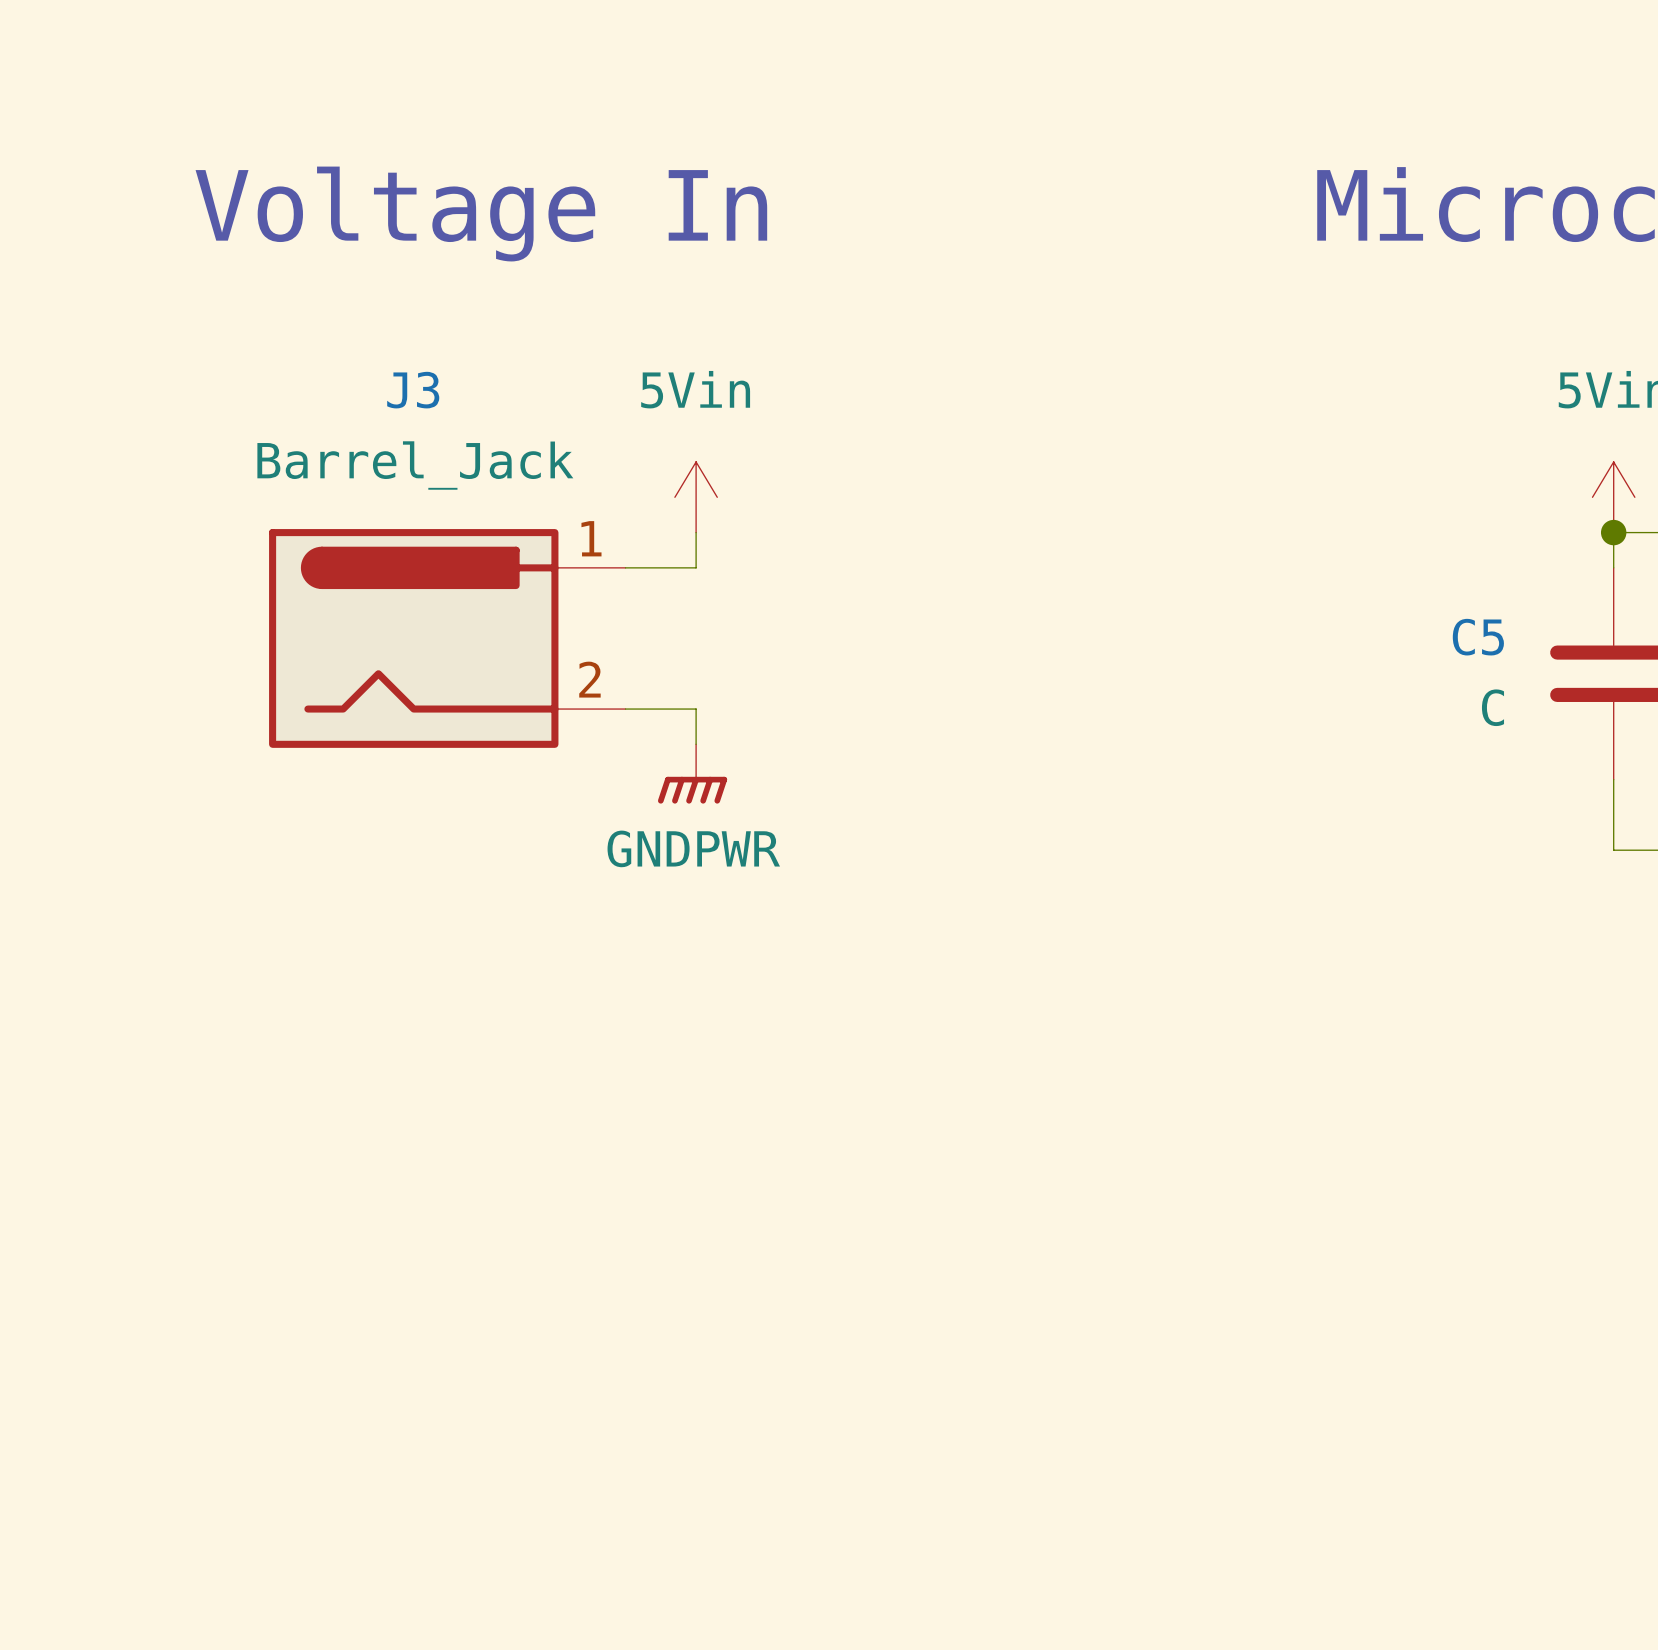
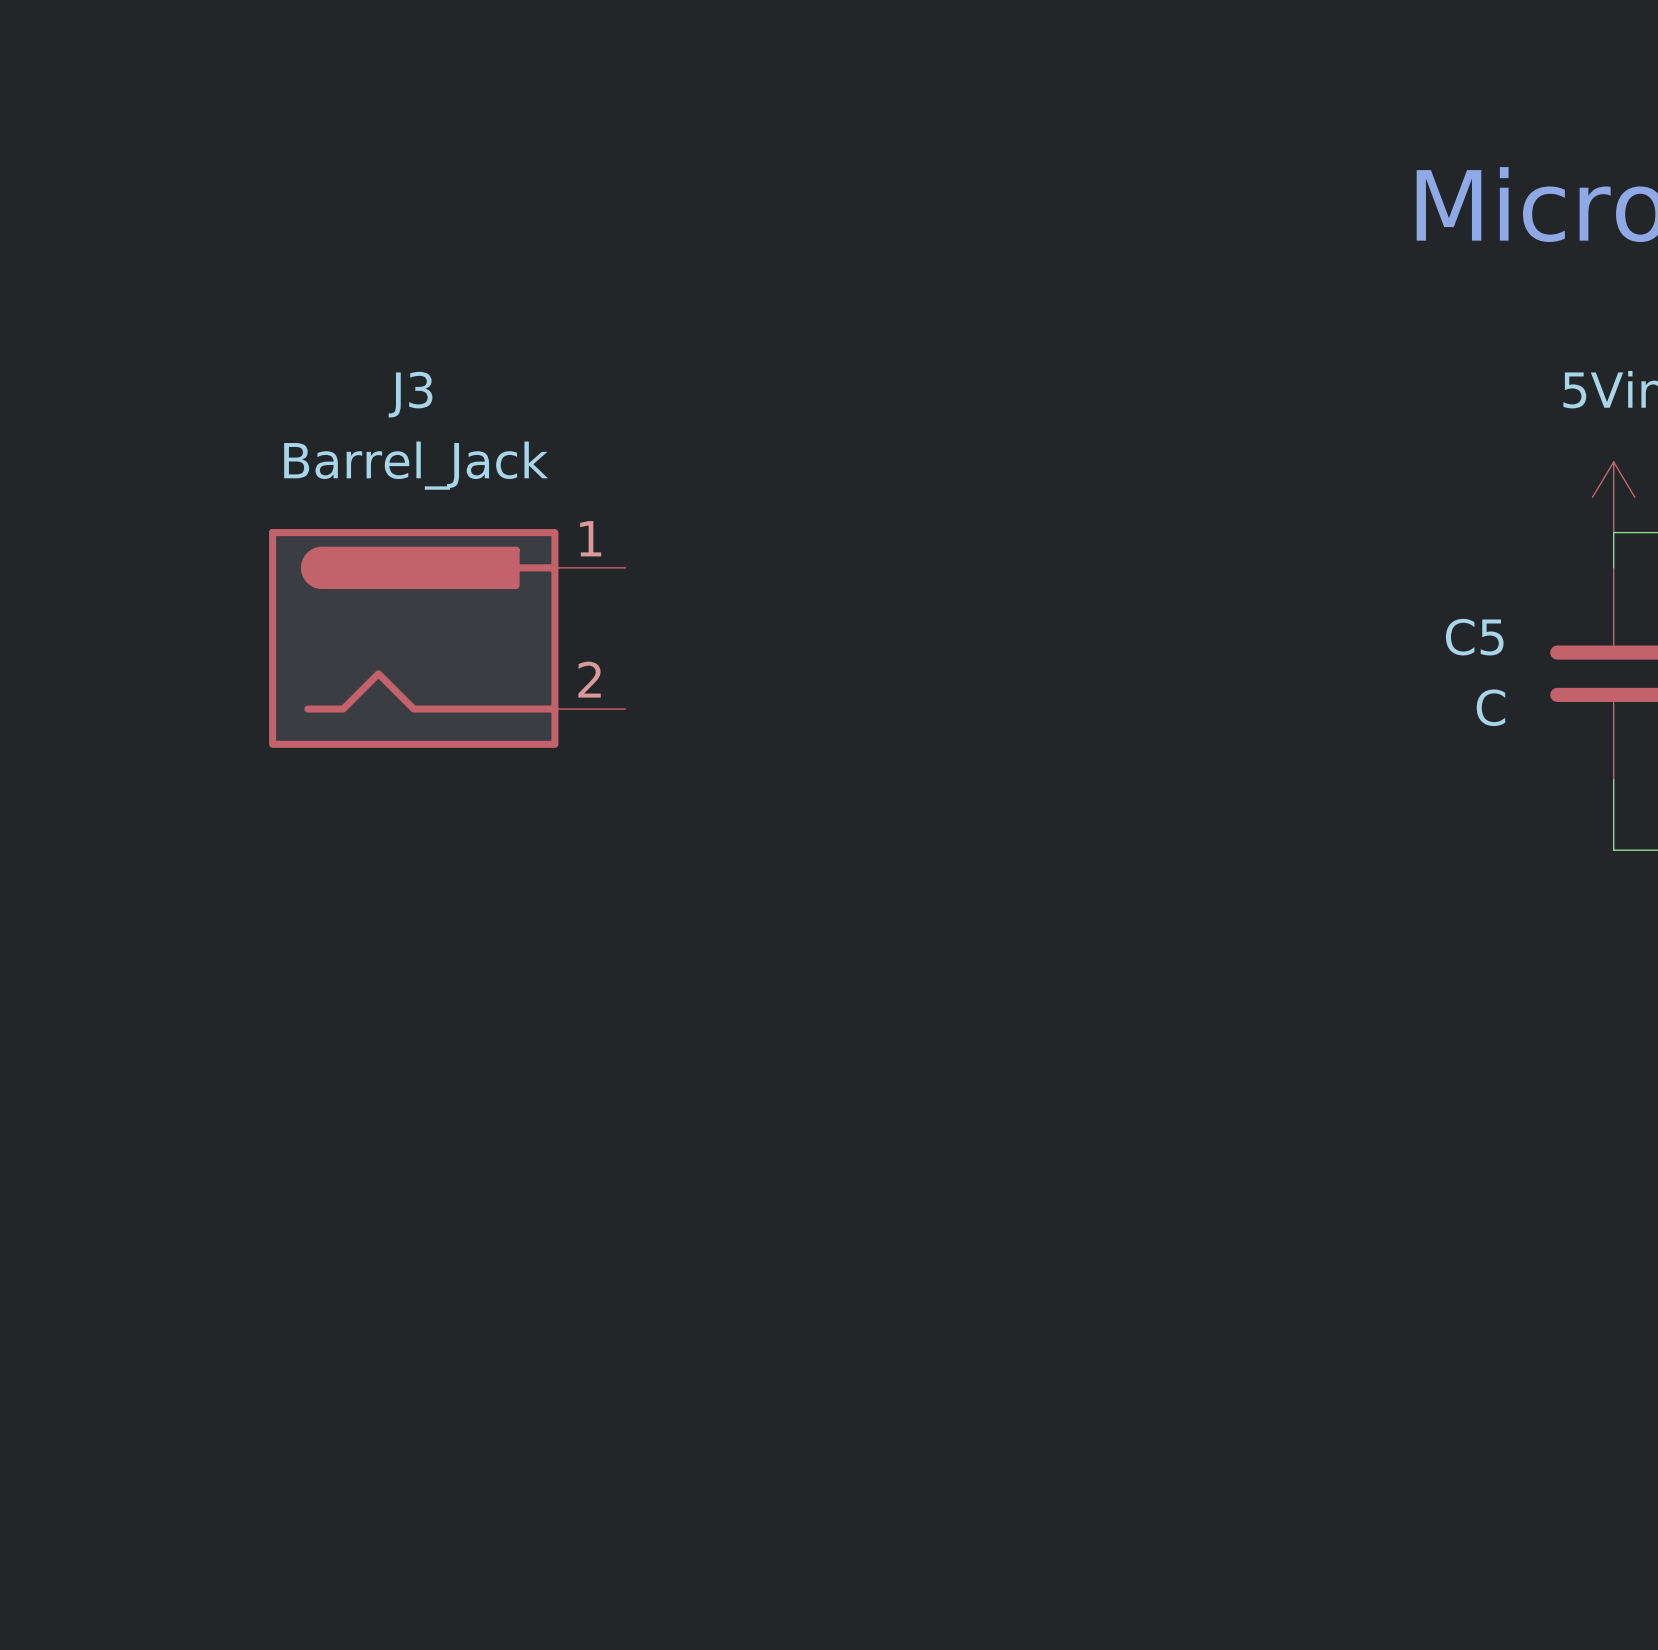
text: Voltage In (481, 214) -> none
power symbol: 5Vin (696, 497) -> none
wire: (696, 532) (696, 567) (625, 567) -> none
junction: (1613, 532) -> none
wire: (625, 709) (696, 709) (696, 744) -> none
power symbol: GNDPWR (692, 773) -> none

